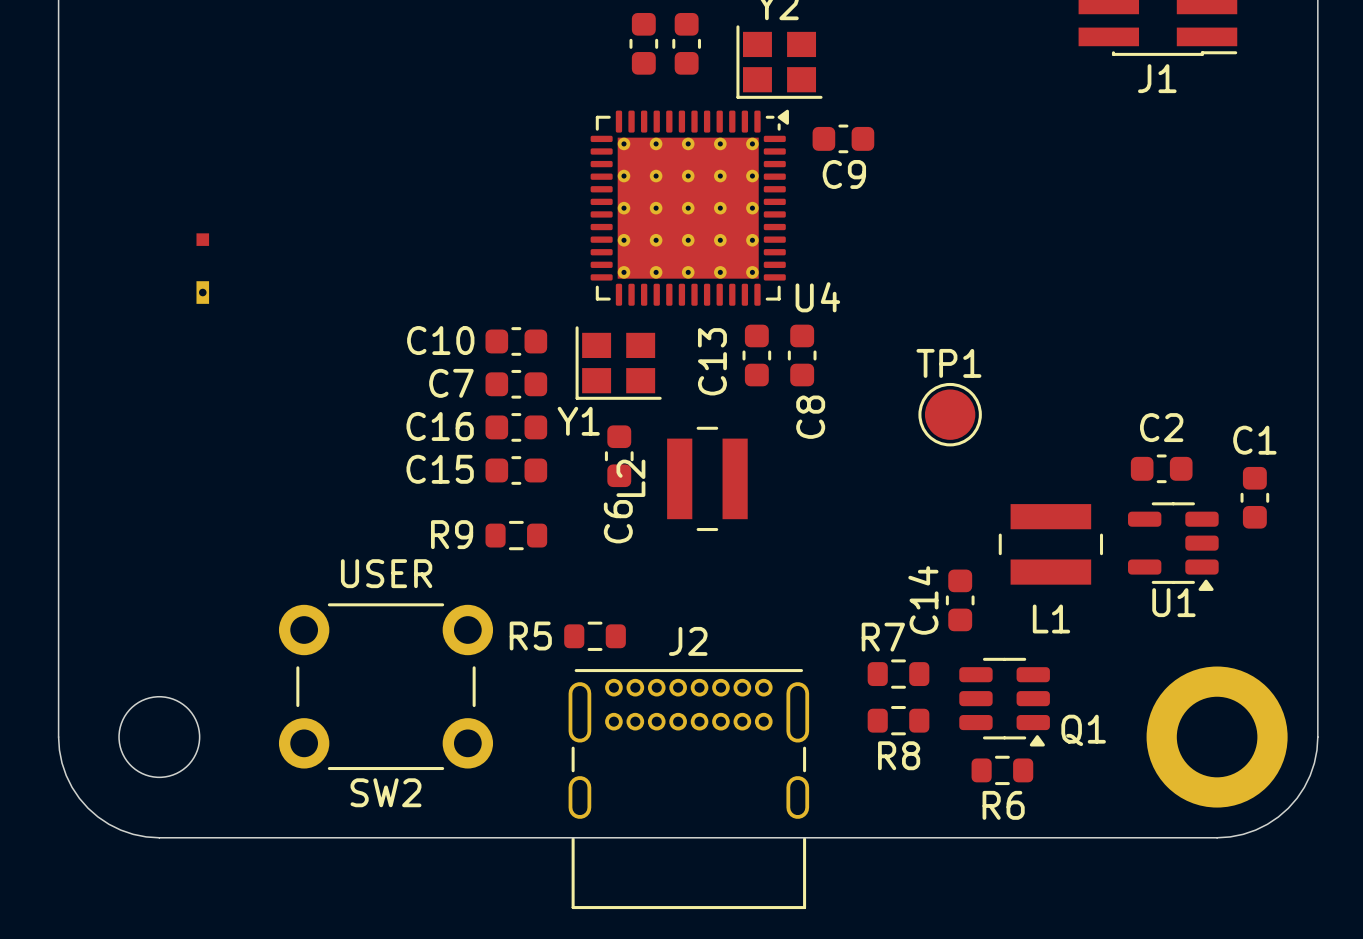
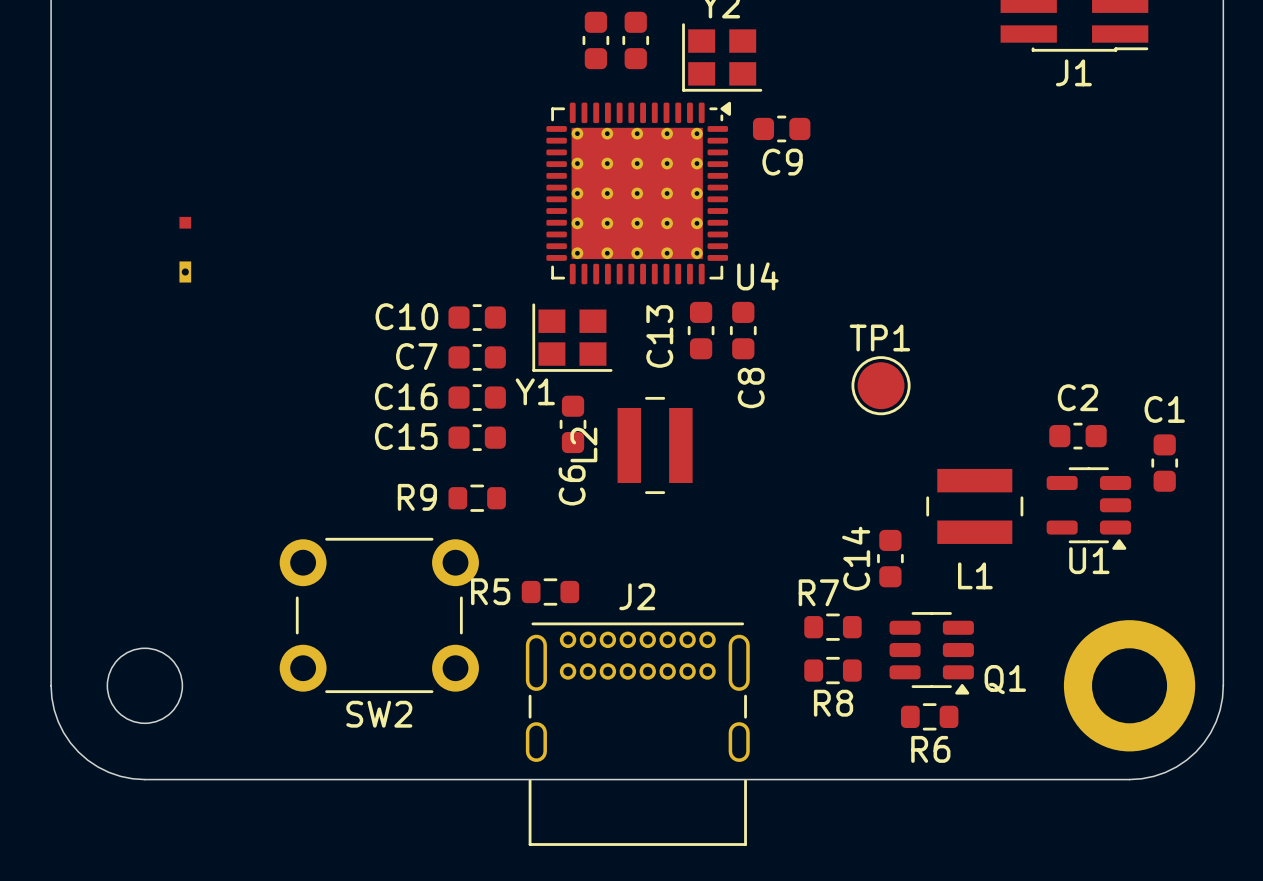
SW2 value: USER (386, 573) -> none
SW2 position: (385, 686) -> (379, 615)

